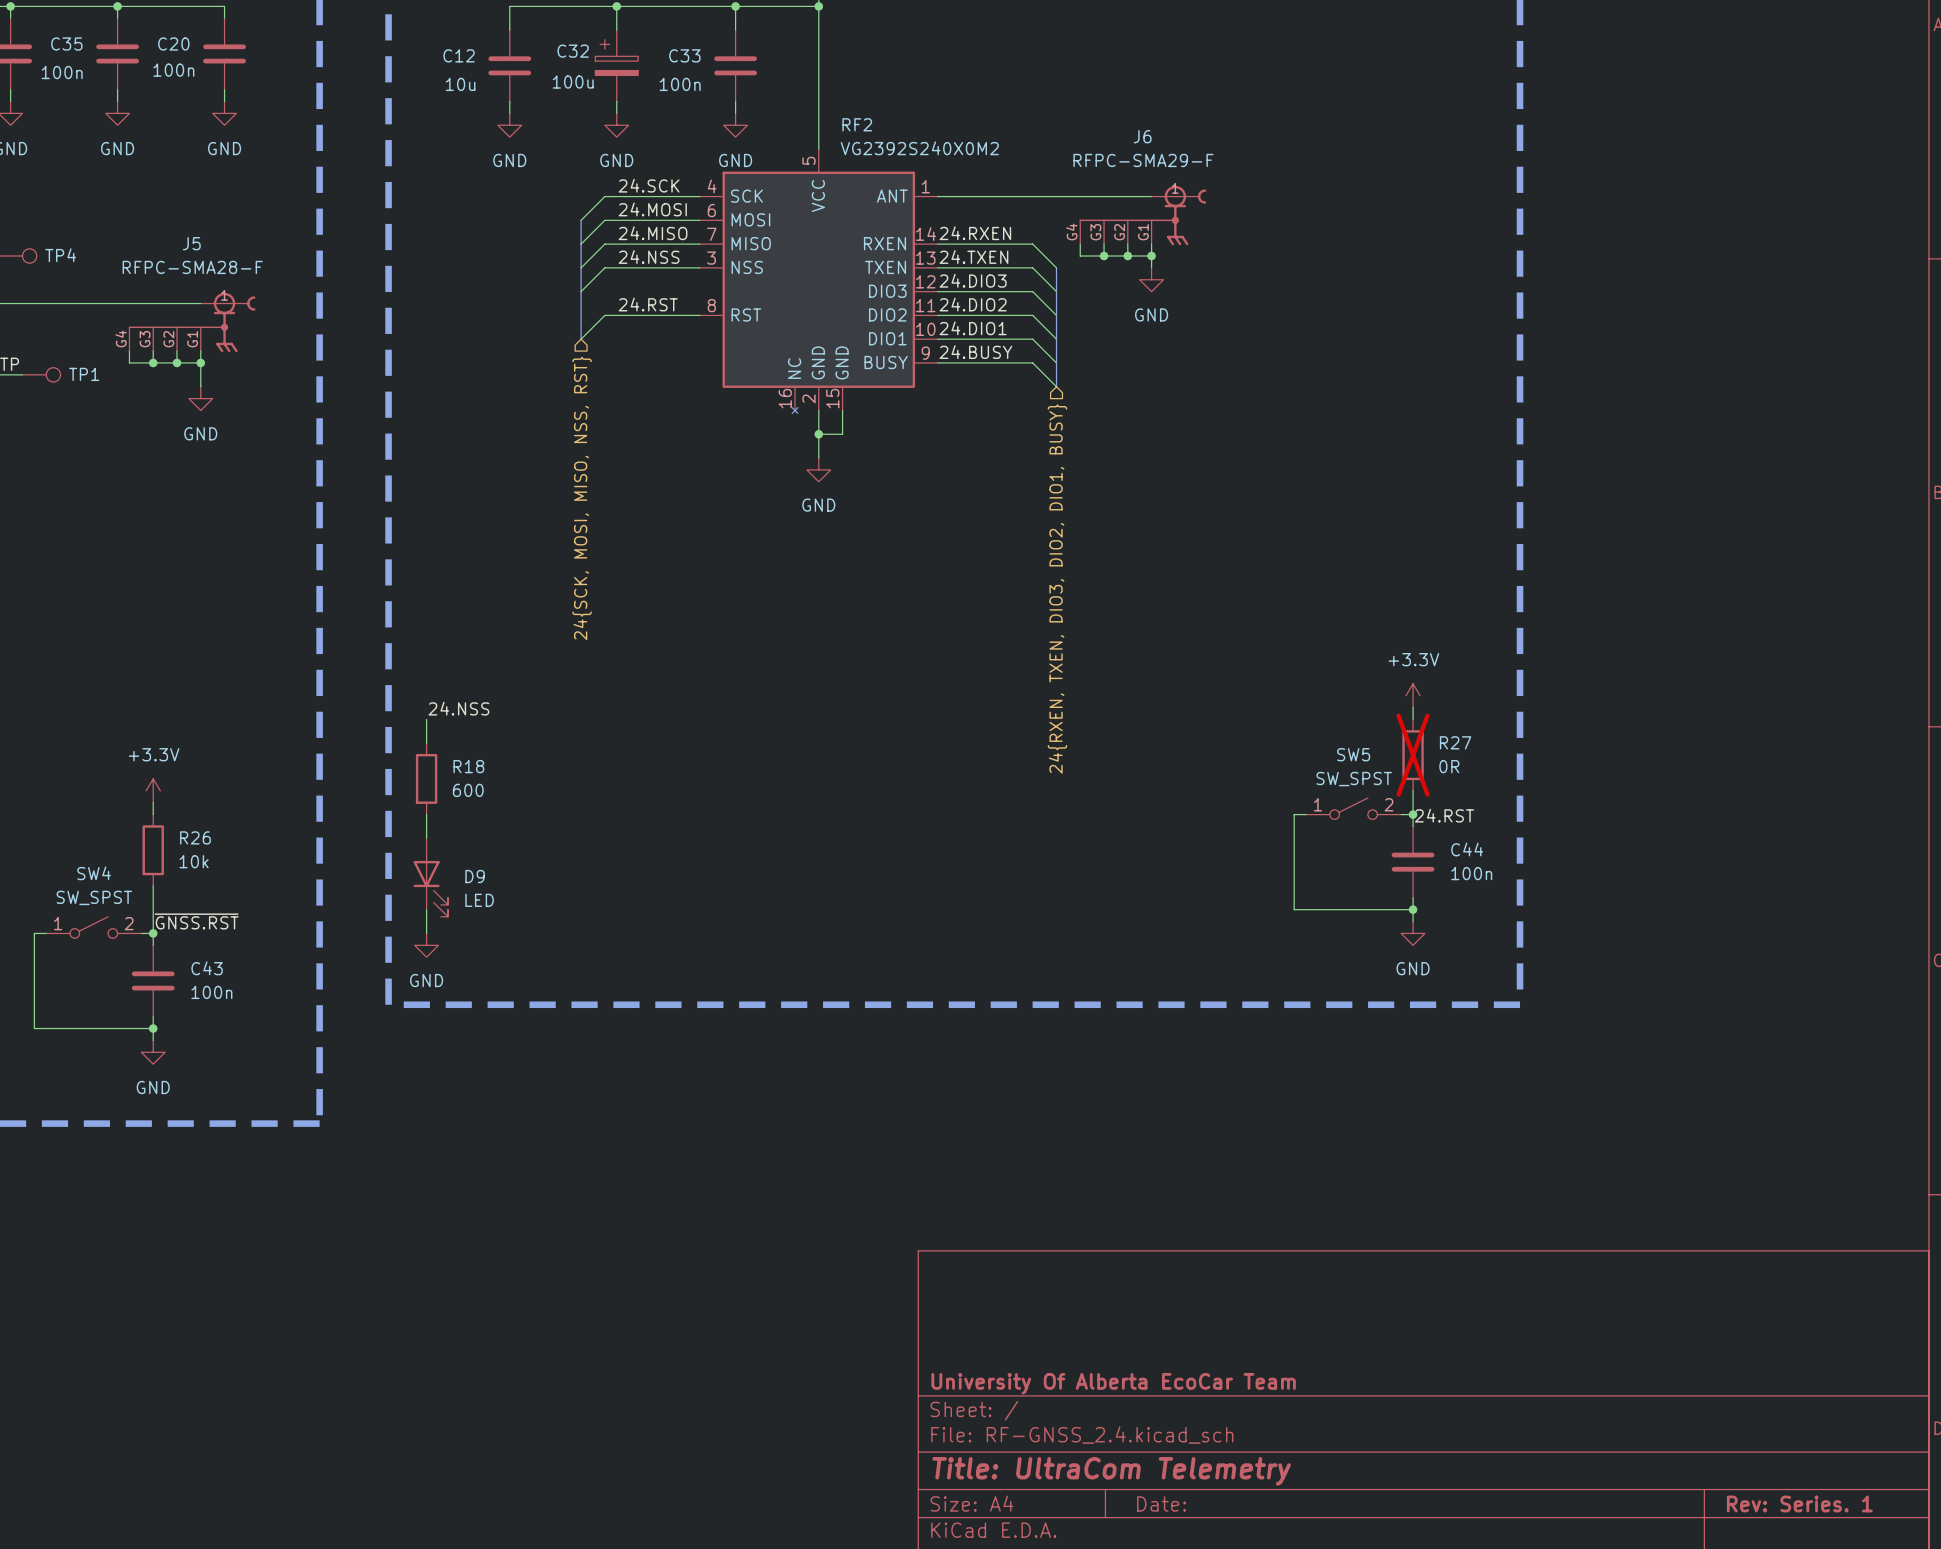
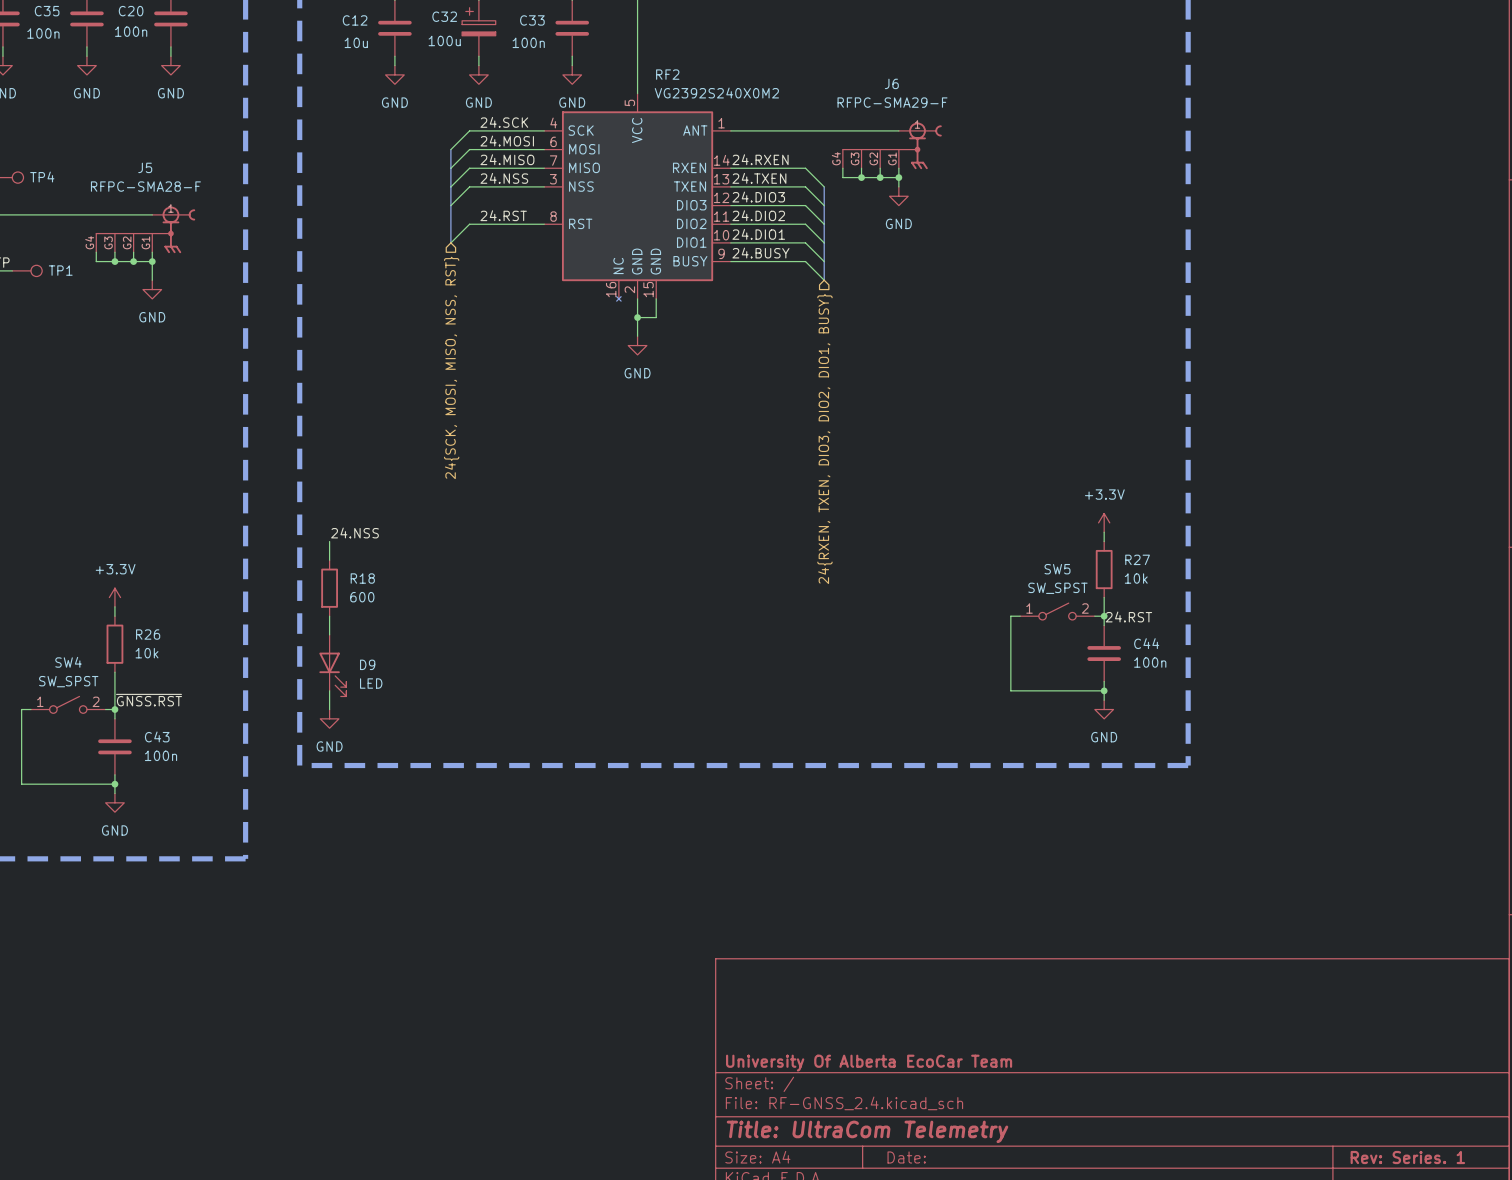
R27 do-not-place cross: (1413, 755) -> none
R27 value: 0R (1449, 766) -> 10k (1136, 578)

